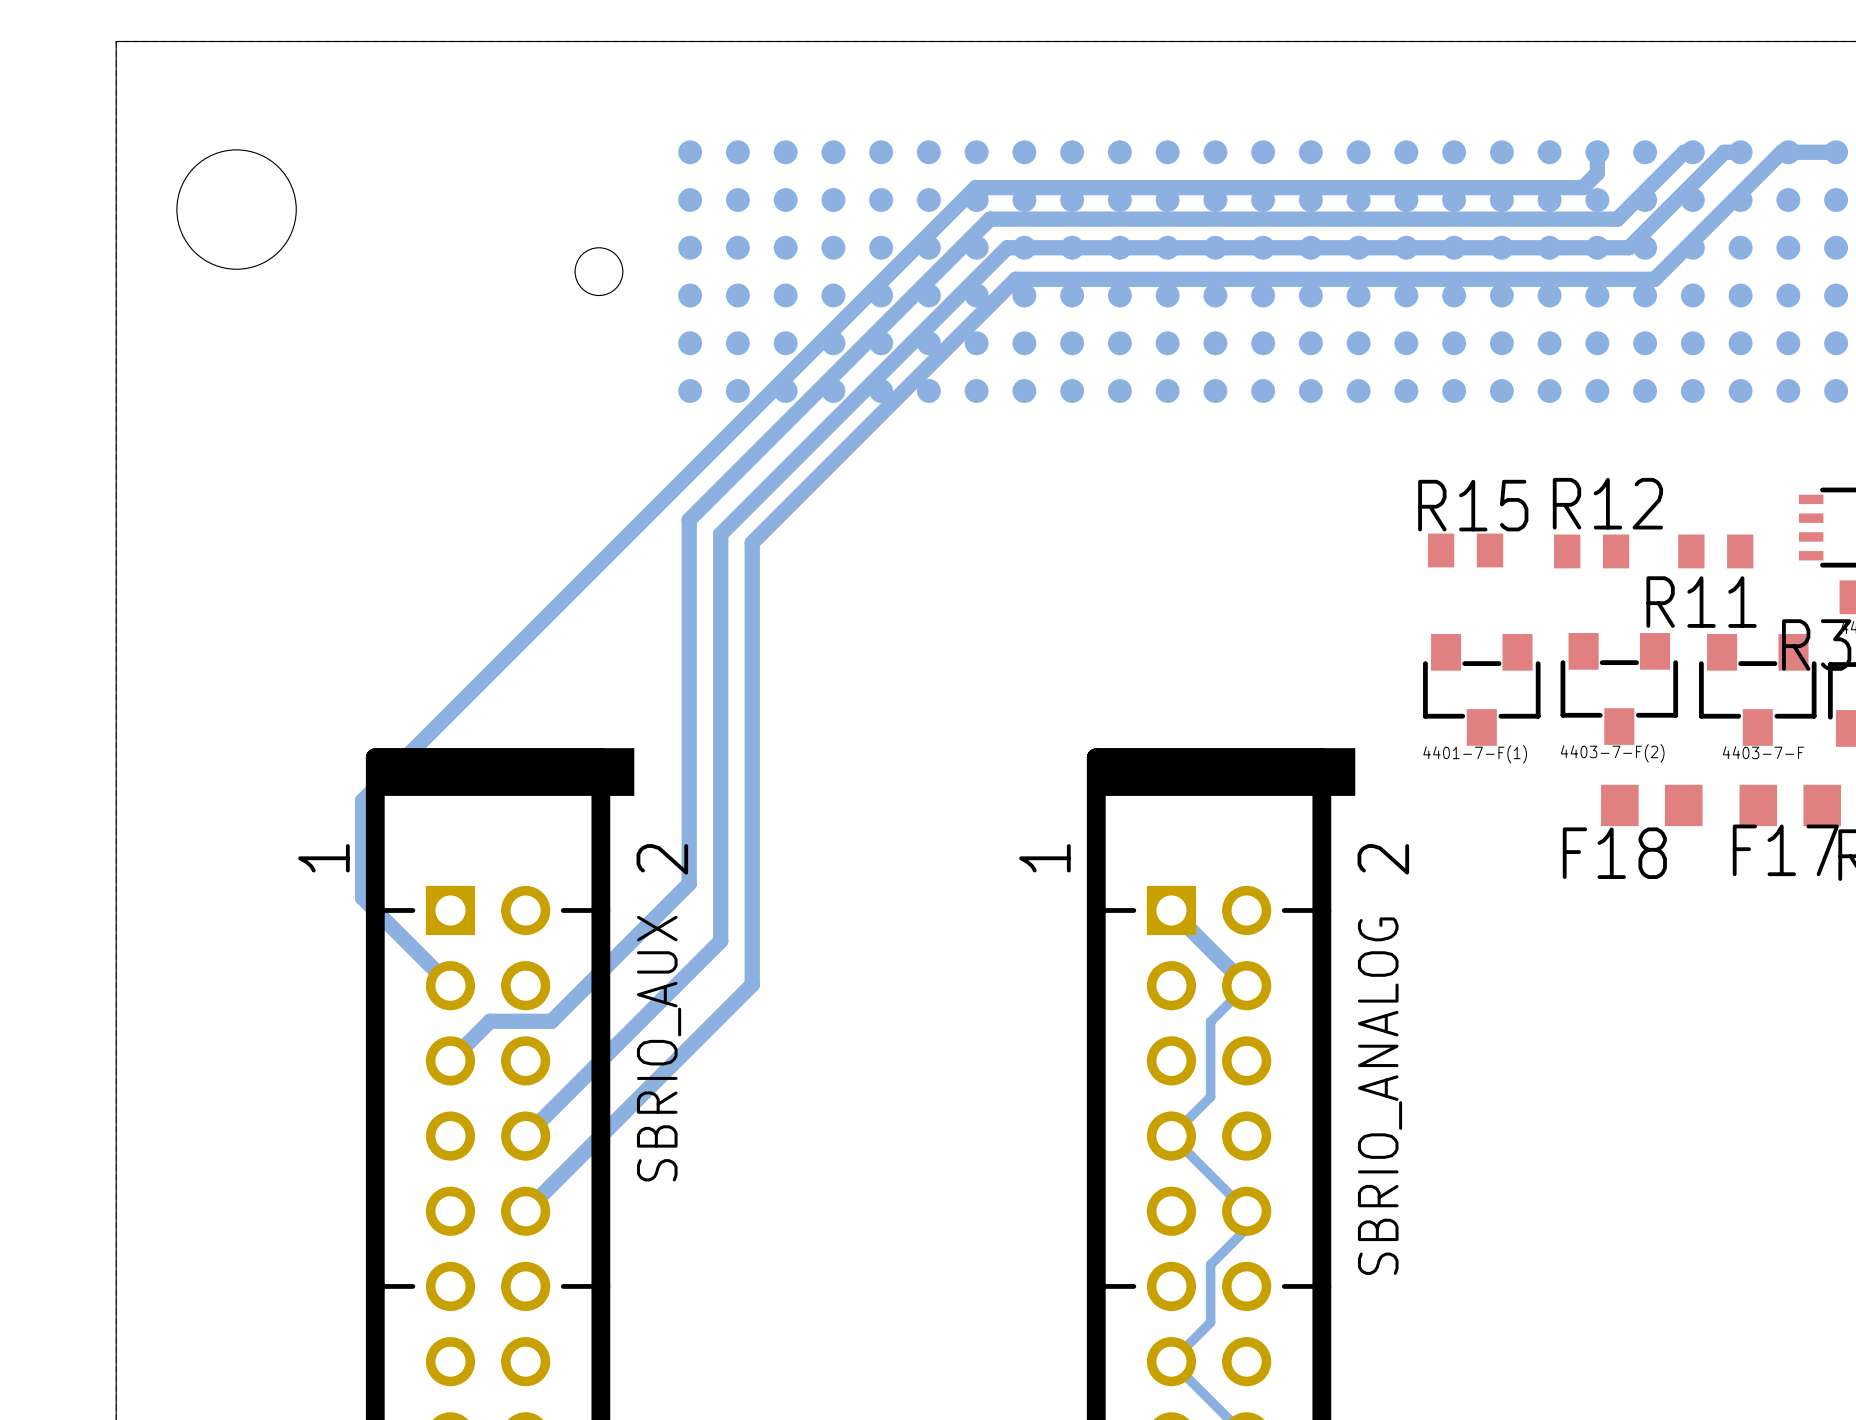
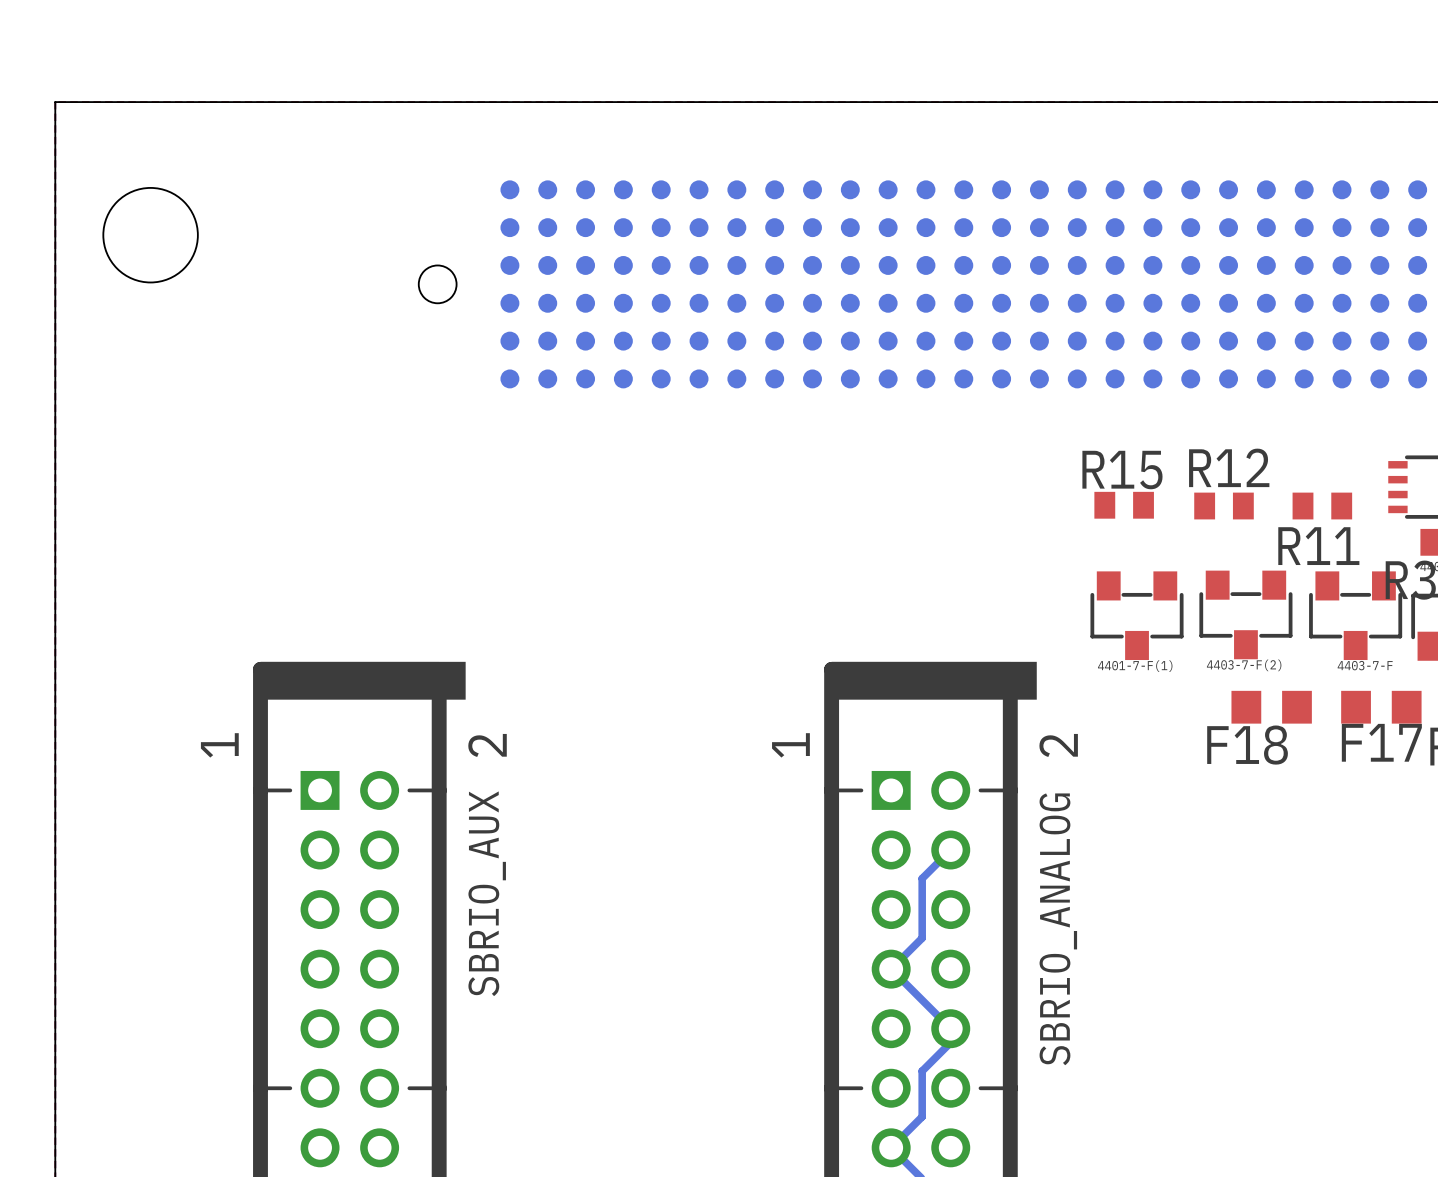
bottom track: (1597, 152) (1597, 173) (1583, 187) (975, 187) (362, 800) (362, 897) (450, 985) -> none
bottom track: (1692, 152) (1684, 152) (1617, 219) (990, 219) (689, 519) (689, 883) (551, 1021) (490, 1021) (450, 1060) -> none
bottom track: (1740, 152) (1724, 152) (1628, 247) (1007, 247) (720, 534) (720, 941) (525, 1136) -> none
bottom track: (1836, 152) (1781, 152) (1654, 279) (1015, 279) (752, 542) (752, 984) (525, 1211) -> none
bottom track: (1171, 910) (1246, 985) -> none

